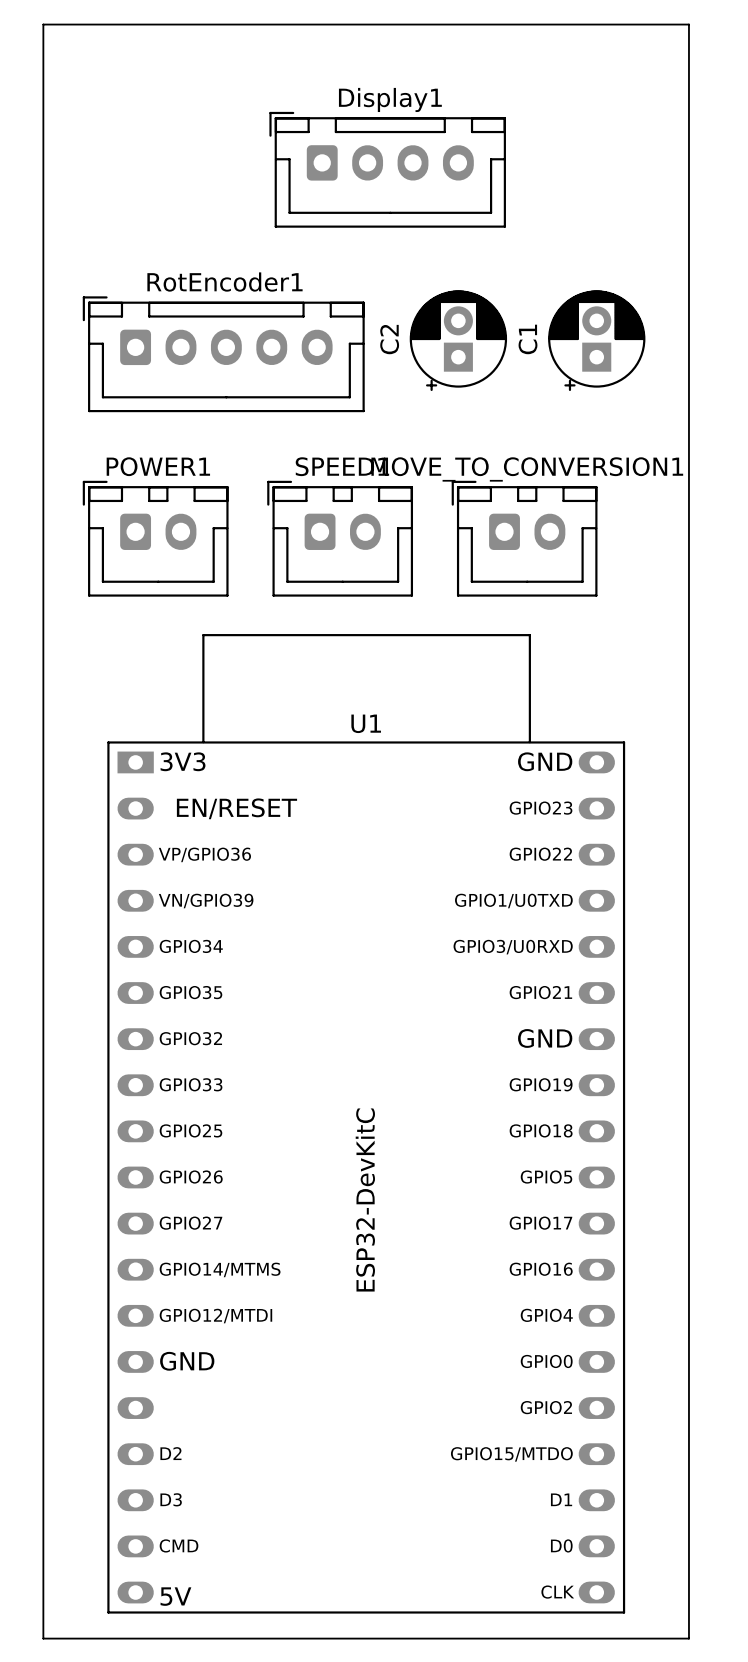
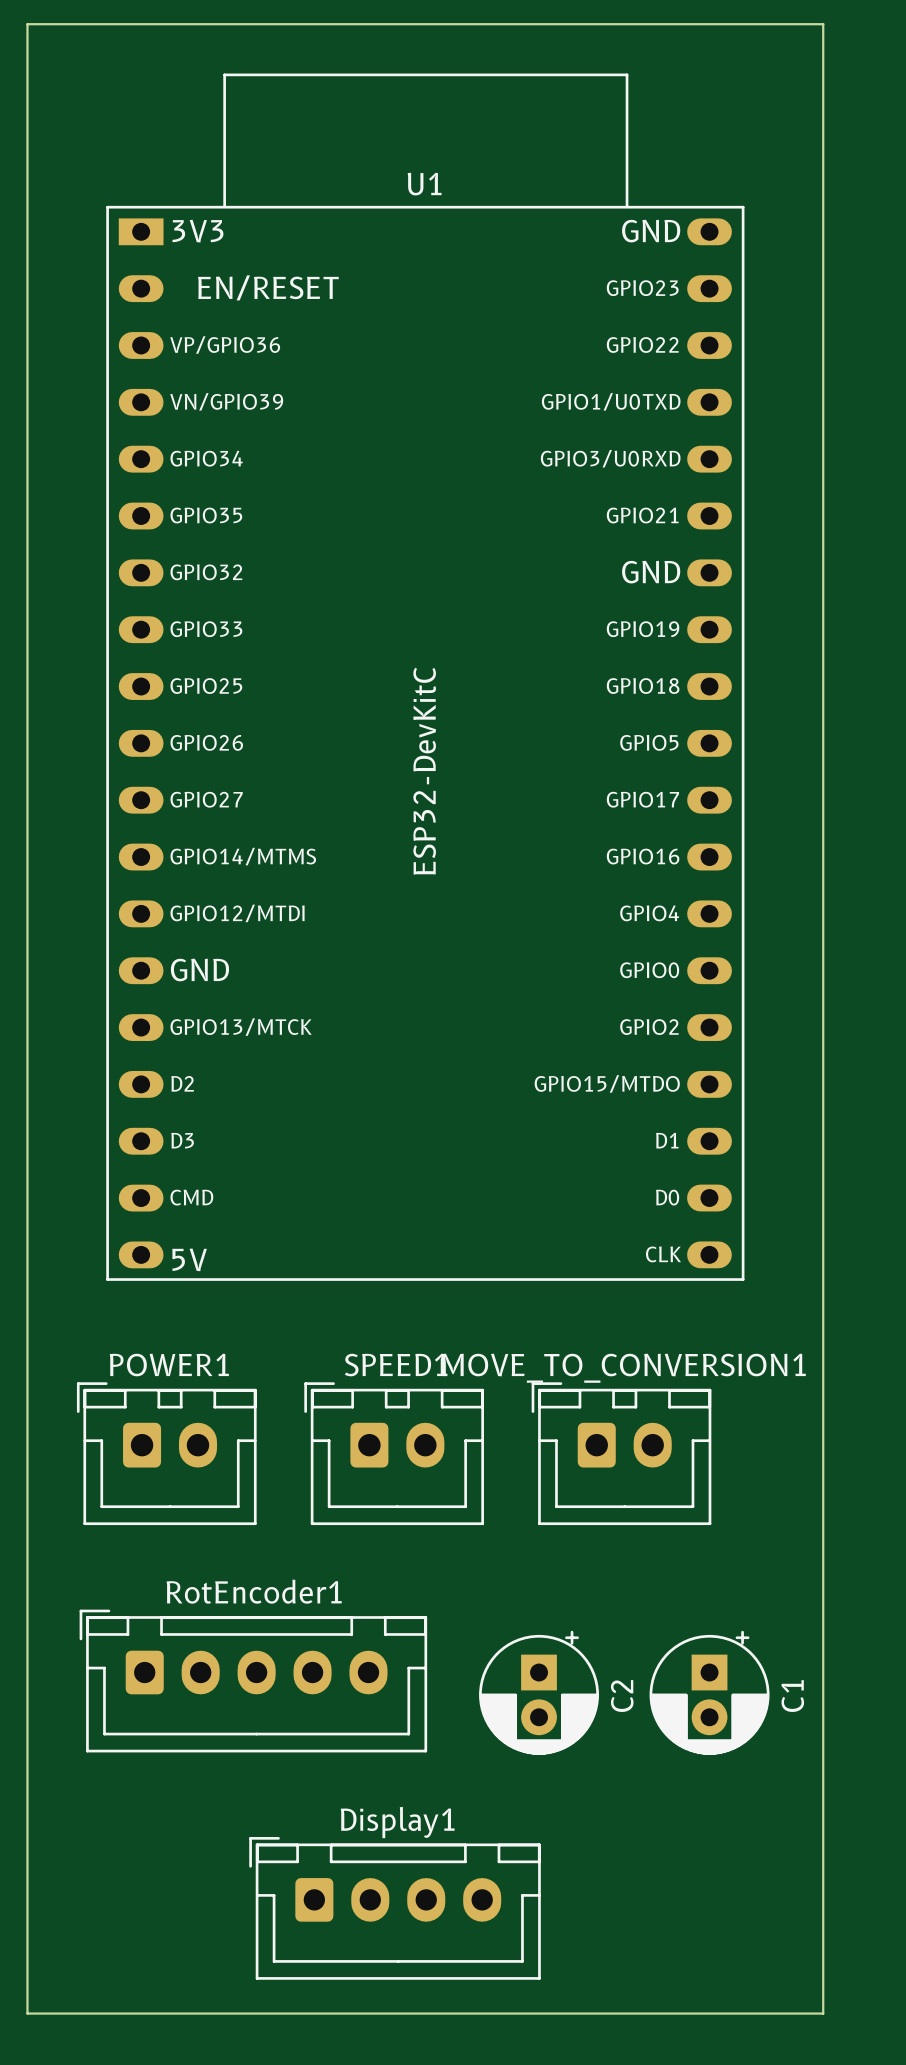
Display1 position: (387, 169) -> (395, 1908)
C2 rotation: 0° (458, 340) -> 180° (539, 1692)
C2 position: (458, 340) -> (539, 1692)
C1 rotation: 0° (596, 340) -> 180° (709, 1692)
C1 position: (596, 340) -> (709, 1692)
RotEncoder1 position: (223, 354) -> (253, 1681)
POWER1 position: (155, 538) -> (166, 1453)
SPEED1 position: (340, 538) -> (394, 1453)
MOVE_TO_CONVERSION1 position: (524, 538) -> (621, 1453)
U1 text: none -> GPIO13/MTCK (241, 1027)
U1 position: (366, 1123) -> (425, 677)

